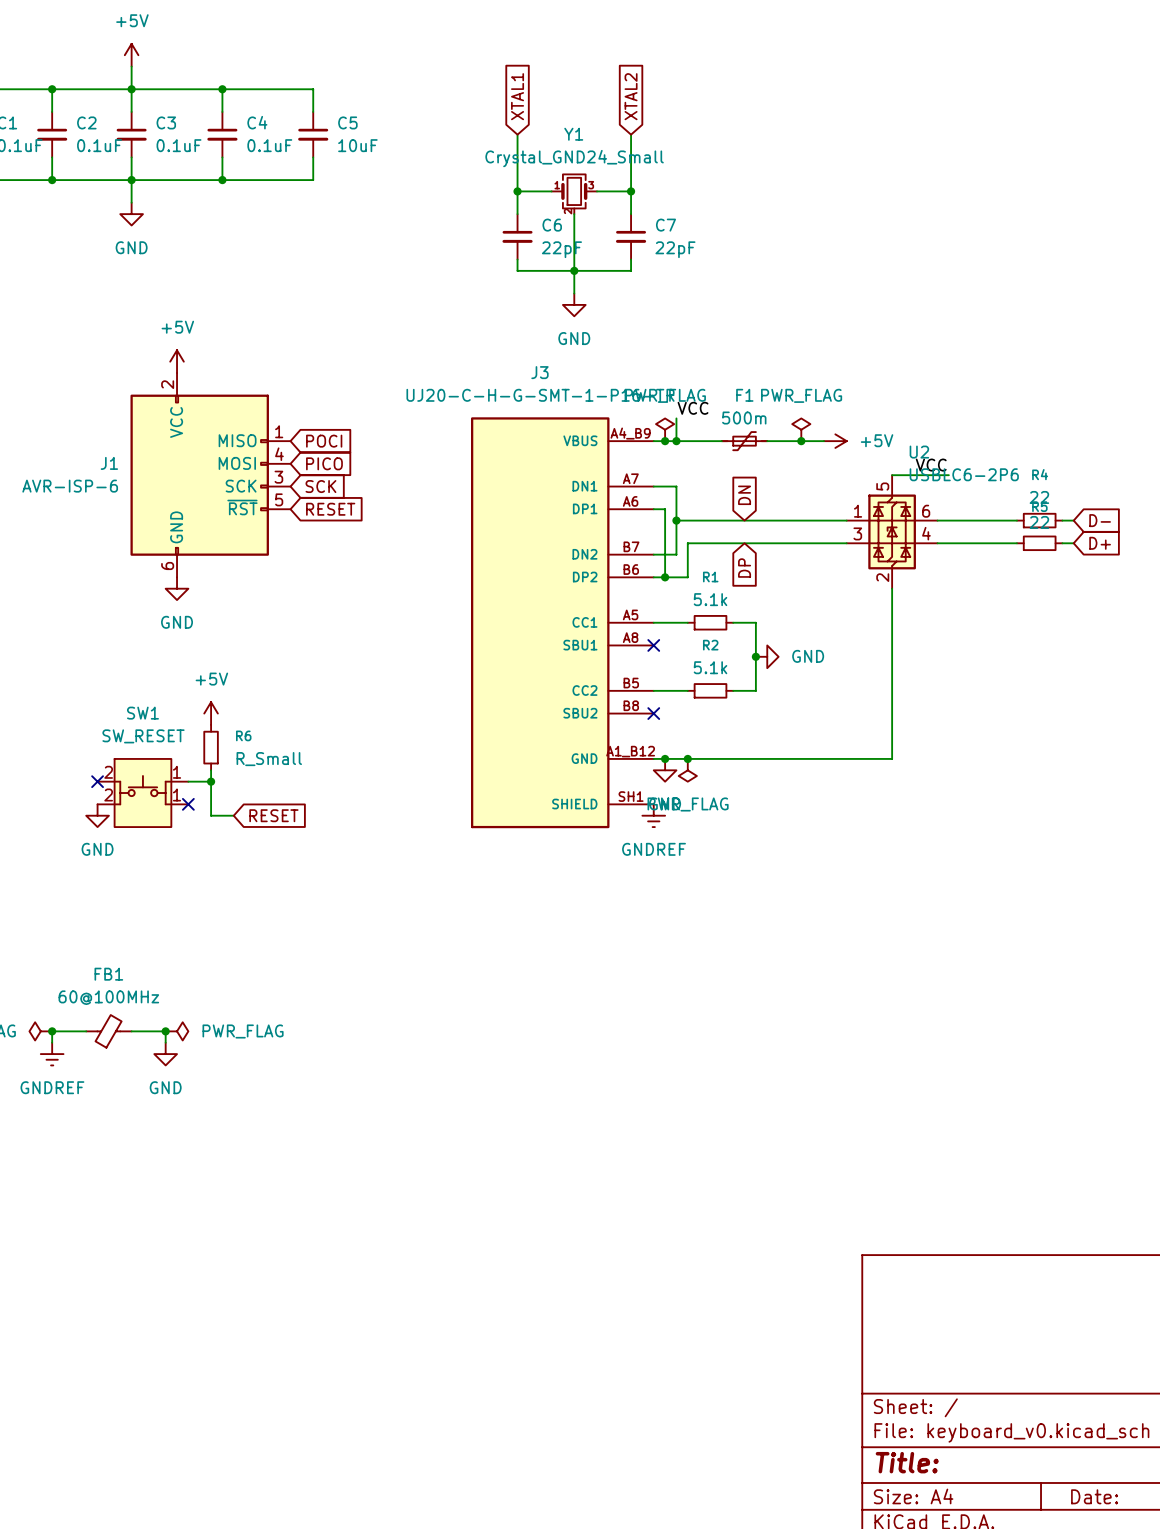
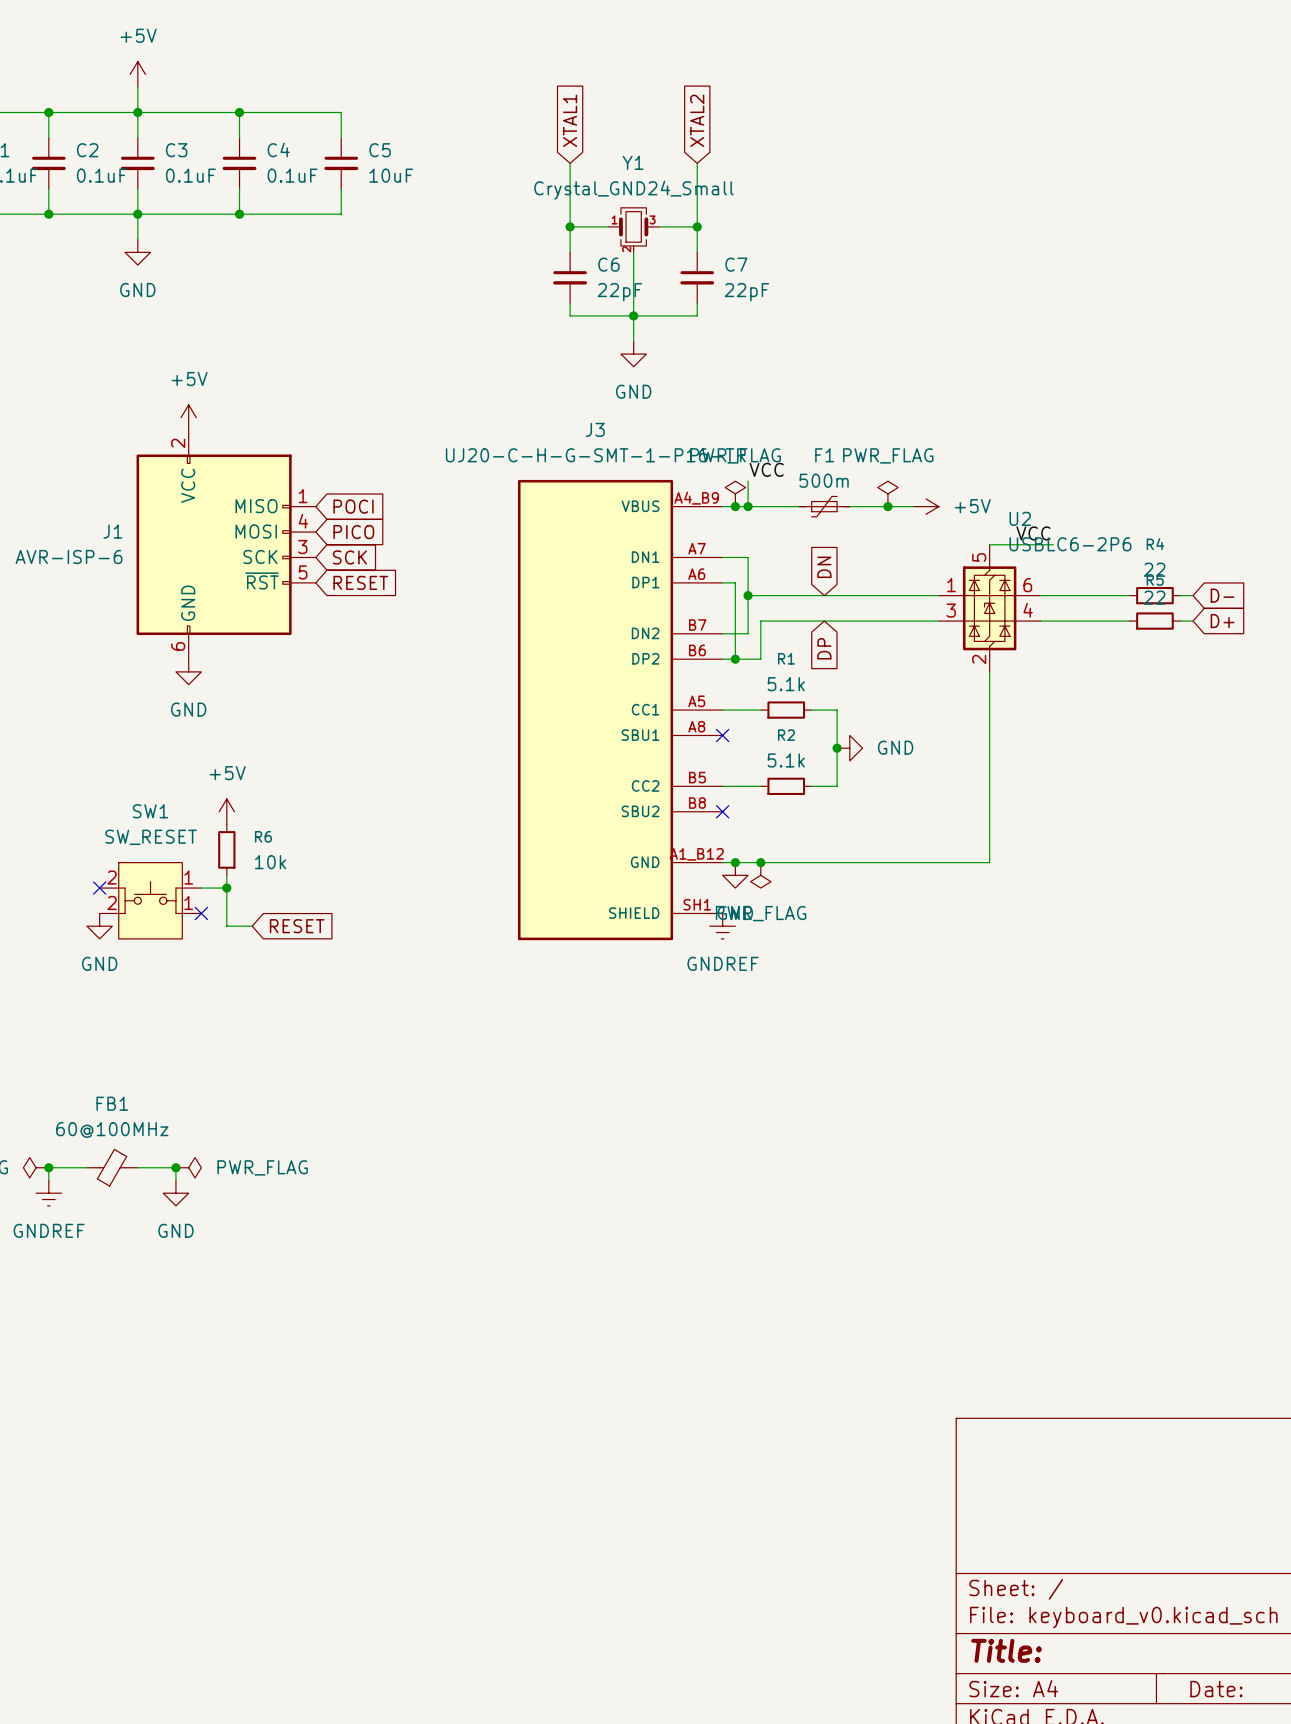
R6 value: R_Small (269, 759) -> 10k (270, 862)

